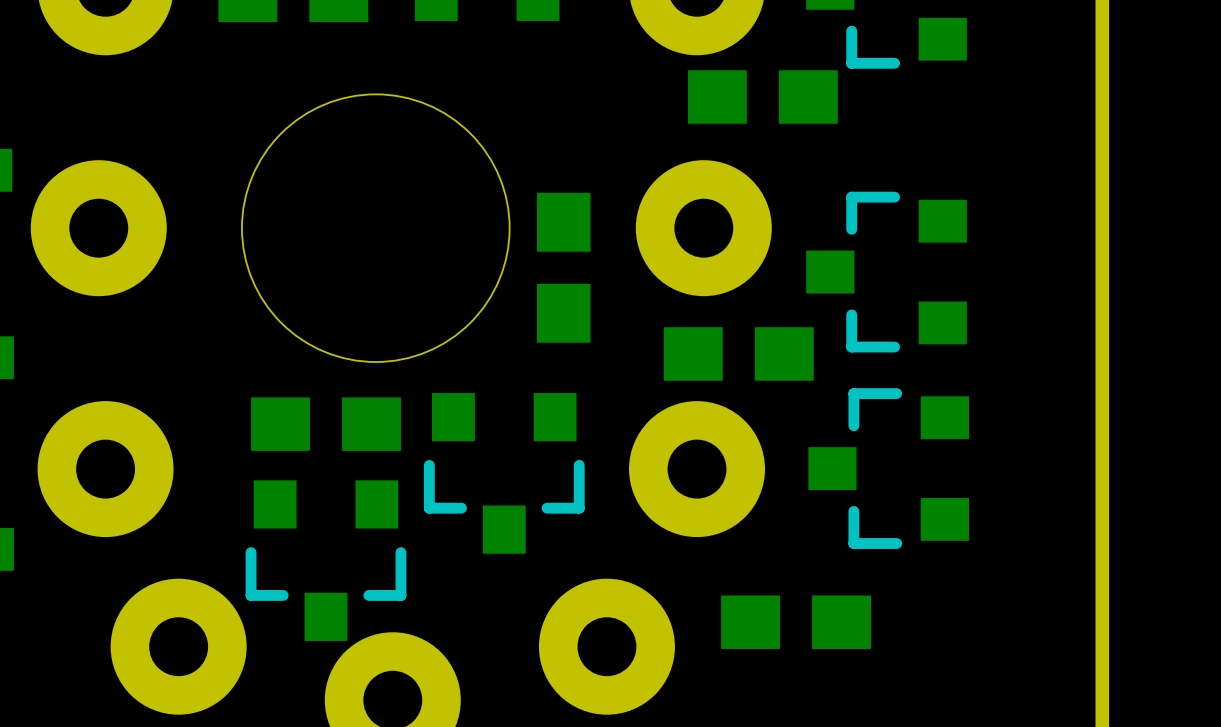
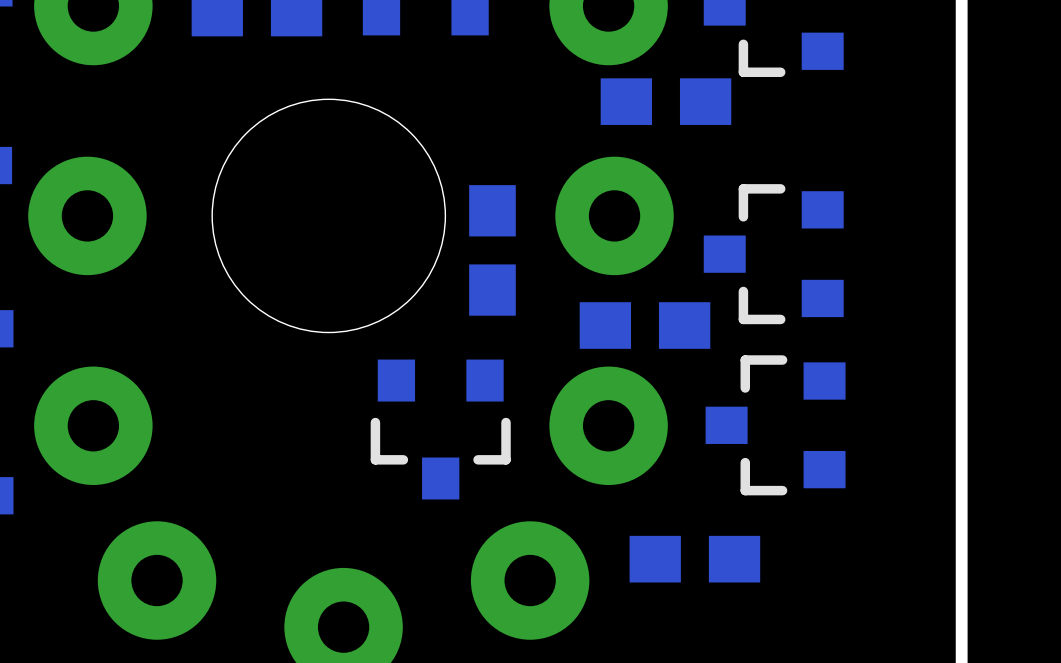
part: (326, 424) -> none
part: (326, 560) -> none

